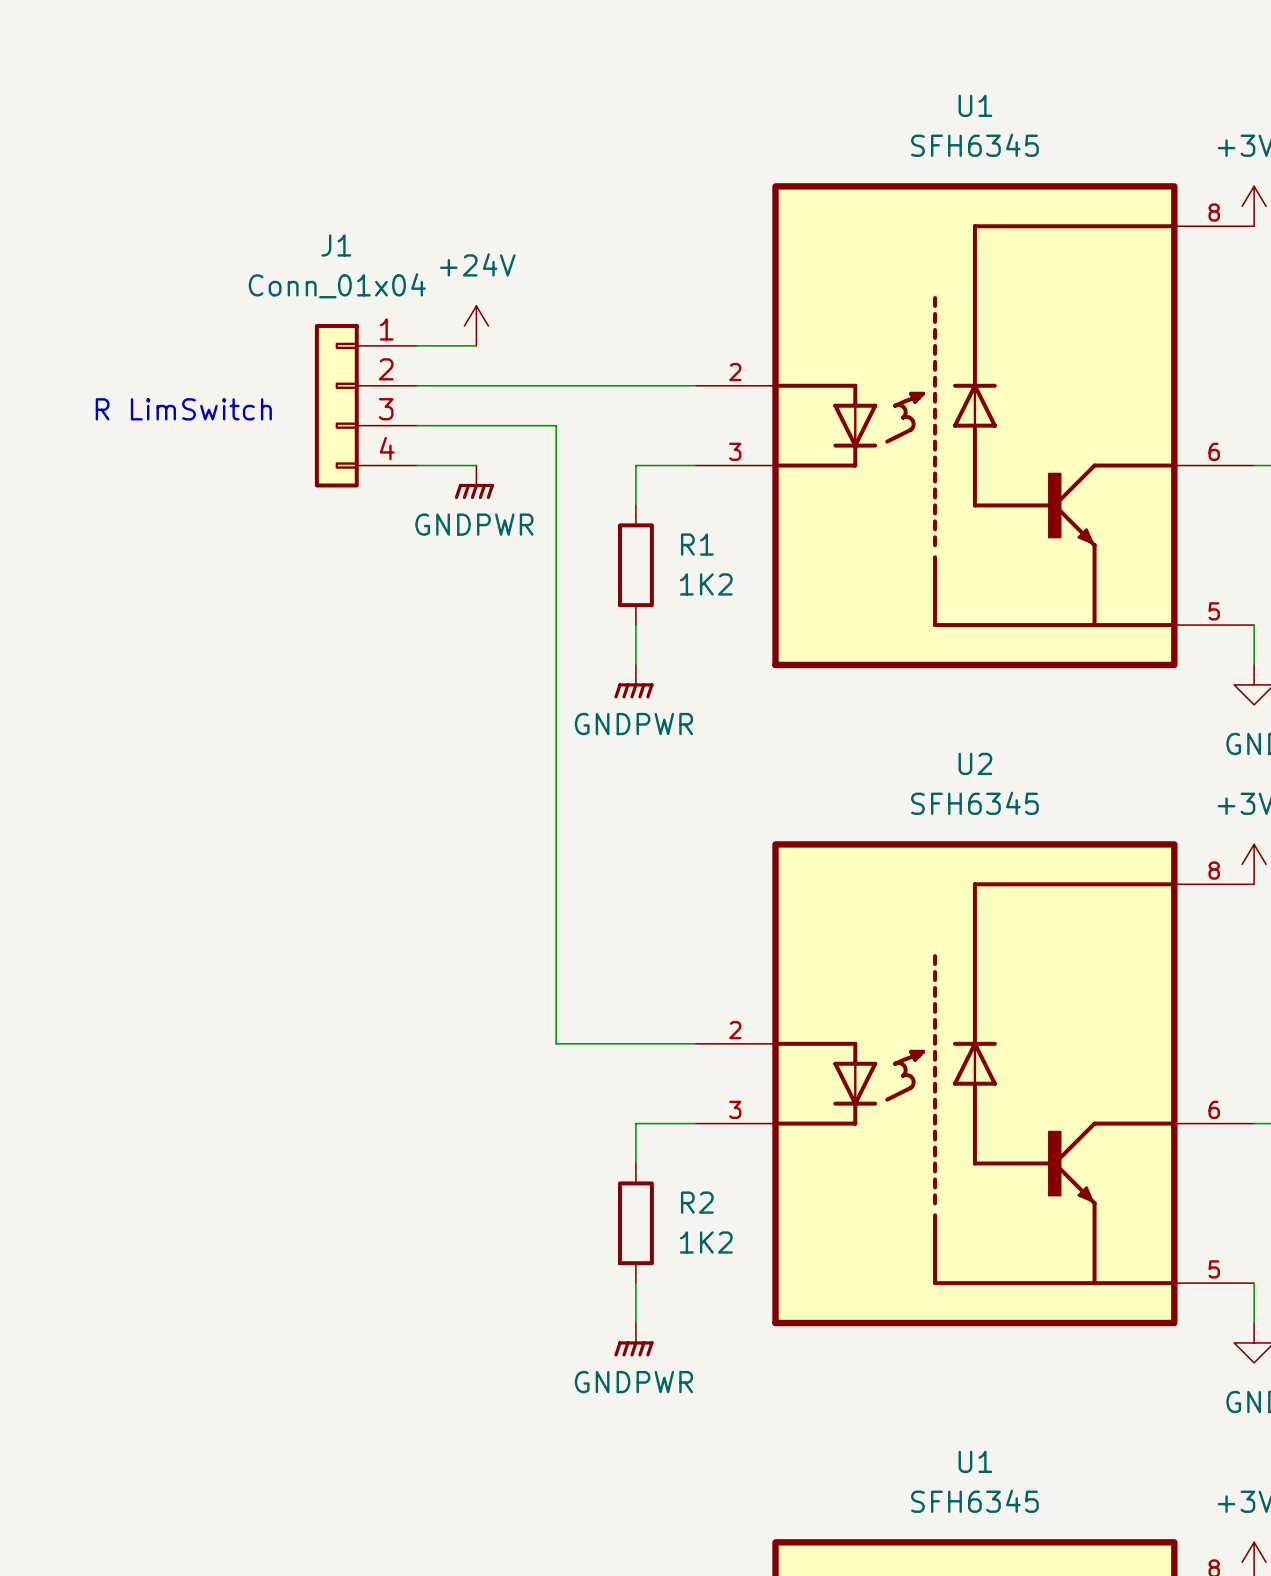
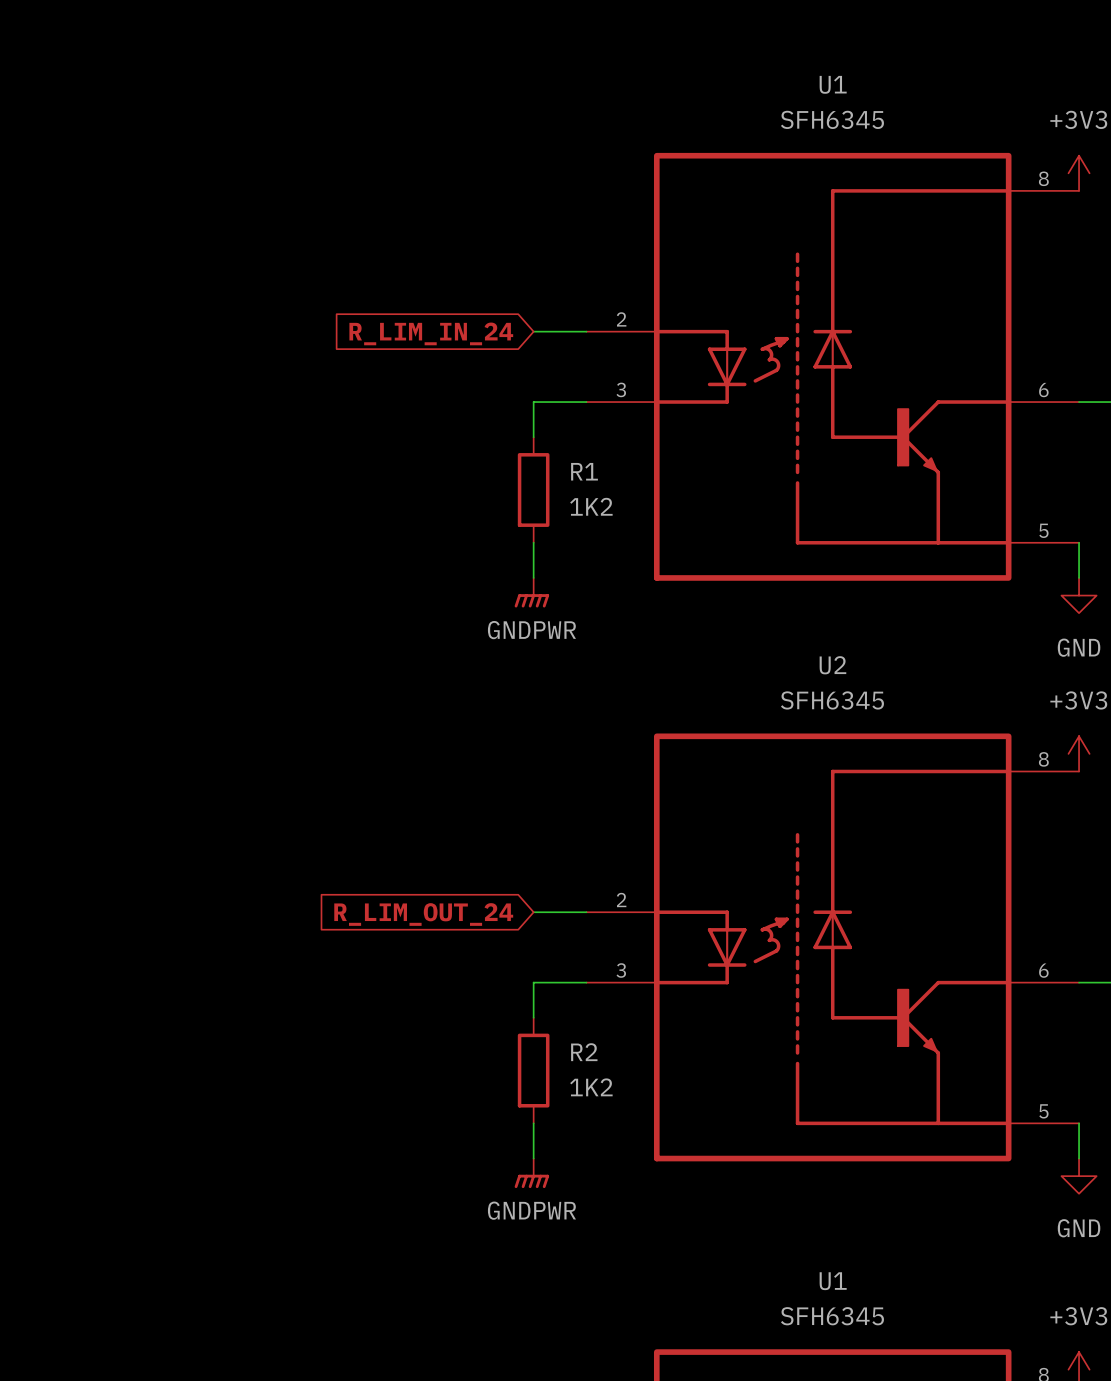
power symbol: +24V (476, 325) -> none
wire: (416, 345) (476, 345) -> none
wire: (416, 385) (635, 385) -> none
global label: none -> R_LIM_IN_24 (431, 333)
J1: Conn_01x04 (365, 405) -> none
text: R LimSwitch (183, 409) -> none
wire: (416, 425) (556, 425) (556, 1043) (635, 1043) -> none
wire: (416, 465) (476, 465) -> none
power symbol: GNDPWR (474, 482) -> none
global label: none -> R_LIM_OUT_24 (423, 914)

